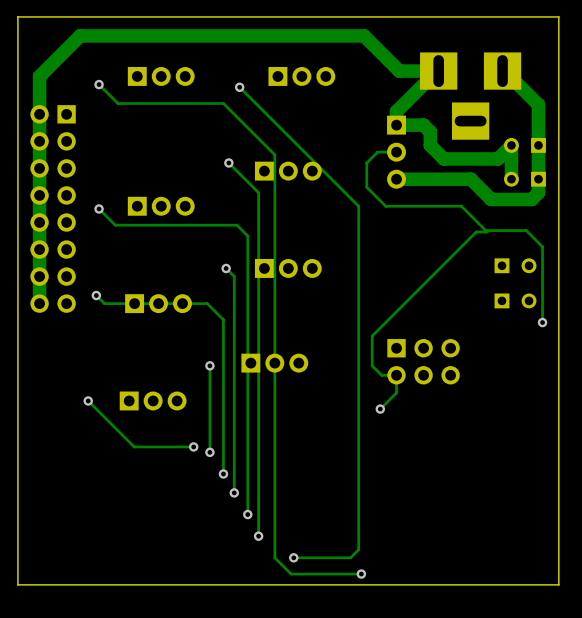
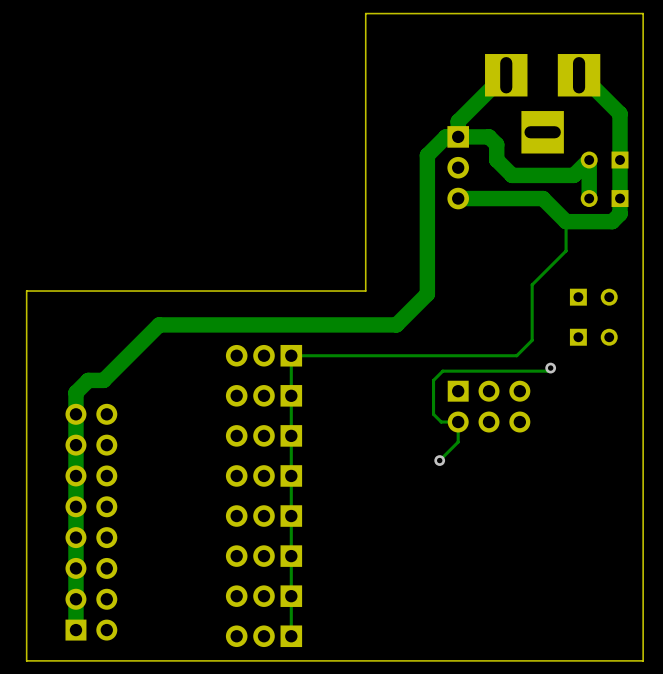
board edge: (315, 16) (17, 16) (17, 260) -> (365, 13) (365, 291) (26, 291)
track: (437, 71) (399, 71) (364, 35) (80, 35) (39, 76) (39, 303) -> none
part: (161, 76) -> none
part: (301, 76) -> none
track: (99, 84) (117, 103) (223, 103) (274, 154) (274, 557) (291, 574) (361, 574) -> none
via: (99, 84) -> none
track: (239, 87) (358, 206) (358, 549) (350, 557) (293, 557) -> none
via: (239, 87) -> none
track: none -> (458, 136) (445, 136) (427, 155) (427, 294) (396, 324) (159, 324) (103, 380) (88, 380) (75, 392) (75, 630)
track: (396, 152) (377, 152) (366, 163) (366, 187) (385, 206) (461, 206) (487, 231) (476, 231) (372, 336) (372, 365) (374, 368) -> (550, 368) (547, 371) (442, 371) (433, 380) (433, 414)
track: (228, 163) (258, 192) (258, 536) -> none
via: (228, 163) -> none
part: (288, 171) -> none
track: none -> (566, 221) (566, 250) (532, 284) (532, 340) (516, 355) (291, 355) (291, 636)
part: (161, 206) -> none
part rotation: 0° (53, 208) -> 180° (91, 522)
part position: (53, 208) -> (91, 522)
track: (99, 208) (115, 225) (236, 225) (247, 236) (247, 514) -> none
via: (99, 208) -> none
track: (485, 231) (526, 230) (542, 246) (542, 322) -> none
track: (226, 268) (234, 276) (234, 492) -> none
via: (226, 268) -> none
part: (288, 268) -> none
track: (96, 295) (104, 303) (207, 303) (223, 319) (223, 473) -> none
via: (96, 295) -> none
part: (158, 303) -> none
part: none -> (264, 355)
via: (542, 322) -> none
via: none -> (550, 368)
part: none -> (264, 395)
part: (274, 363) -> none
track: (209, 365) (209, 452) -> none
via: (209, 365) -> none
part: none -> (264, 435)
track: (88, 400) (134, 446) (193, 446) -> none
via: (88, 400) -> none
part: (153, 400) -> none
part: none -> (264, 475)
via: (193, 446) -> none
via: (209, 452) -> none
part: none -> (264, 516)
via: (223, 473) -> none
part: none -> (264, 556)
via: (234, 492) -> none
via: (247, 514) -> none
part: none -> (264, 596)
via: (258, 536) -> none
via: (293, 557) -> none
part: none -> (264, 636)
via: (361, 574) -> none

